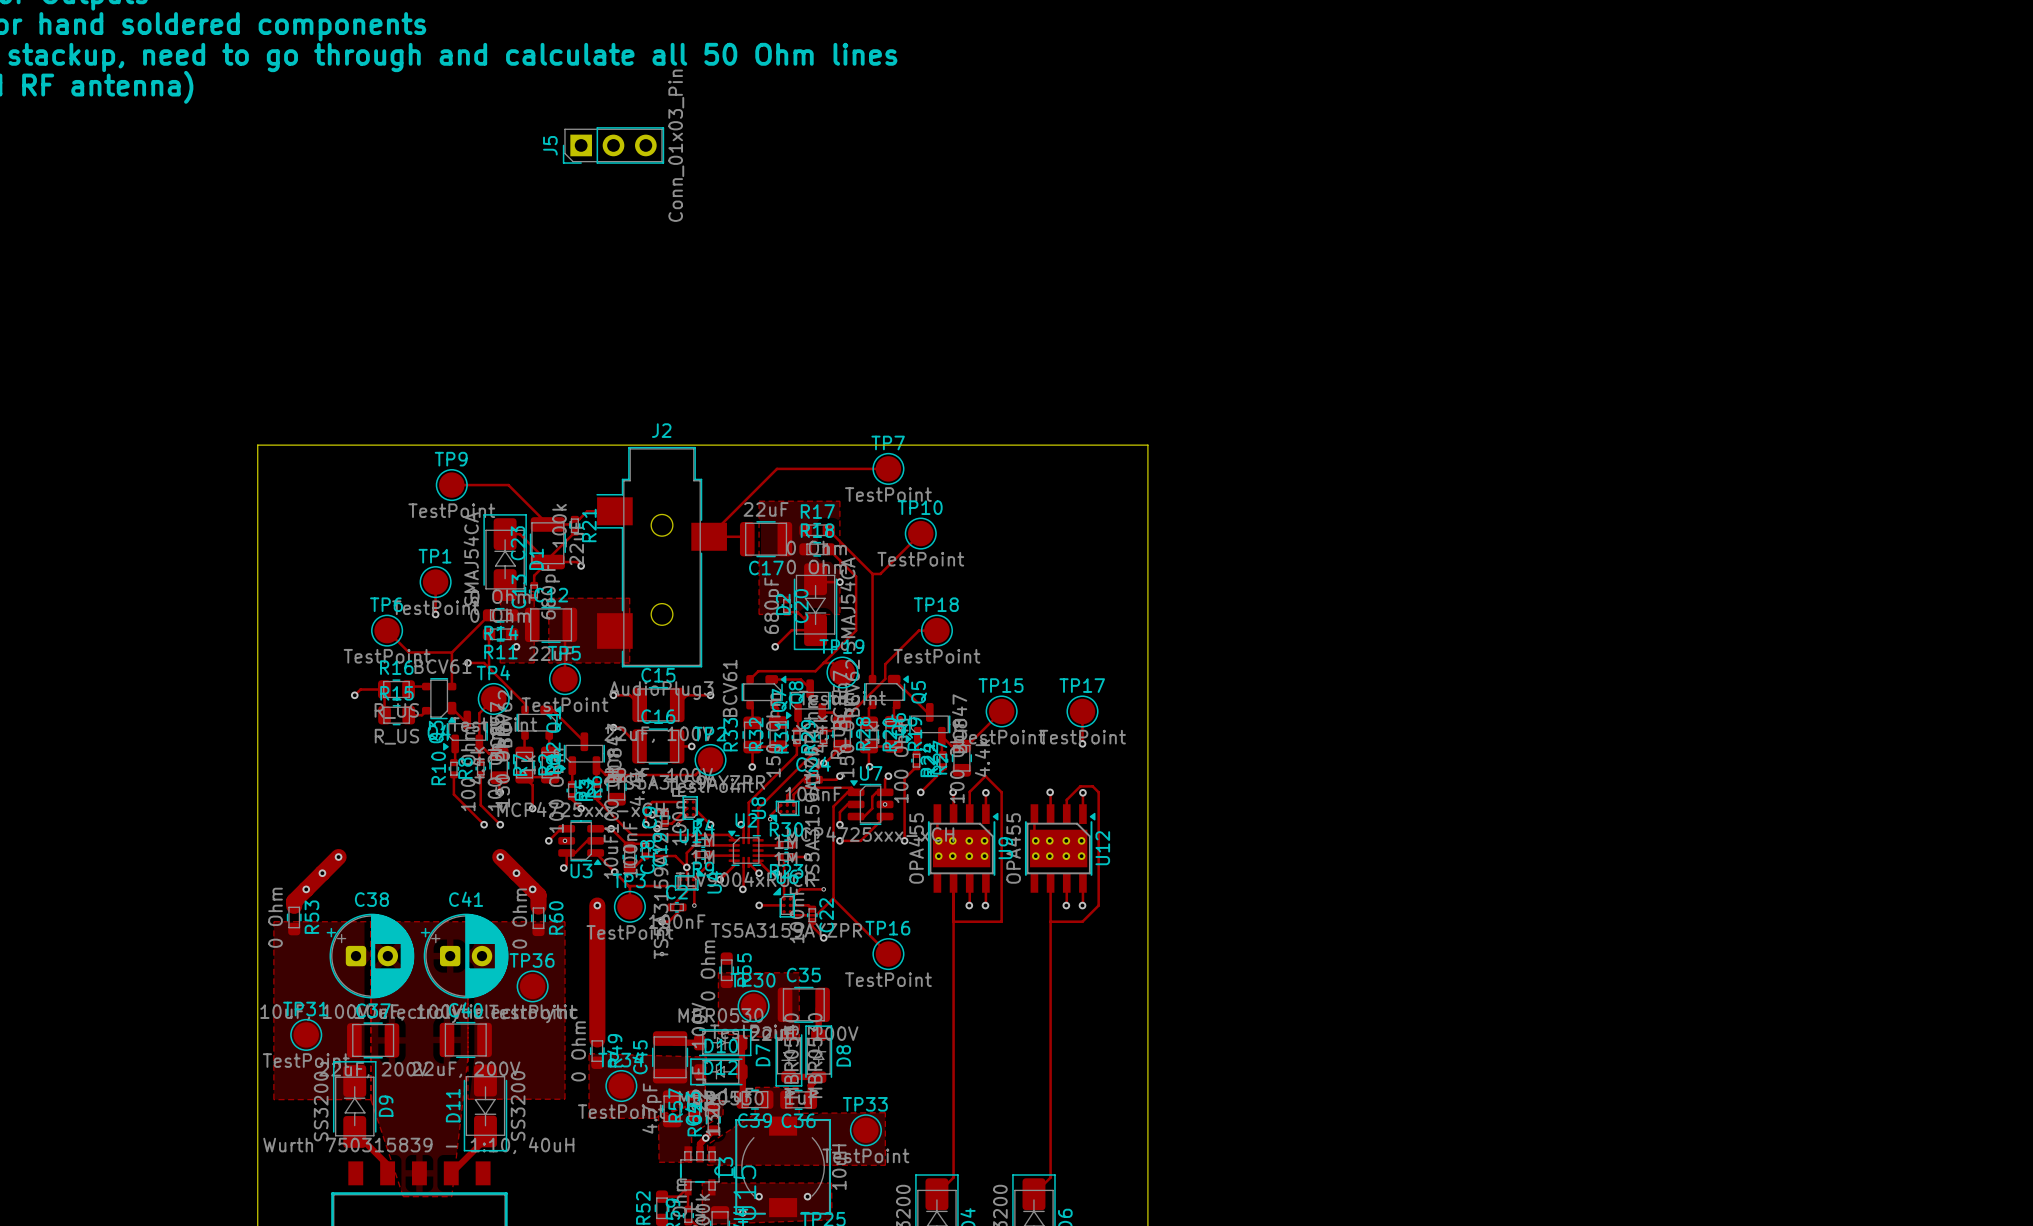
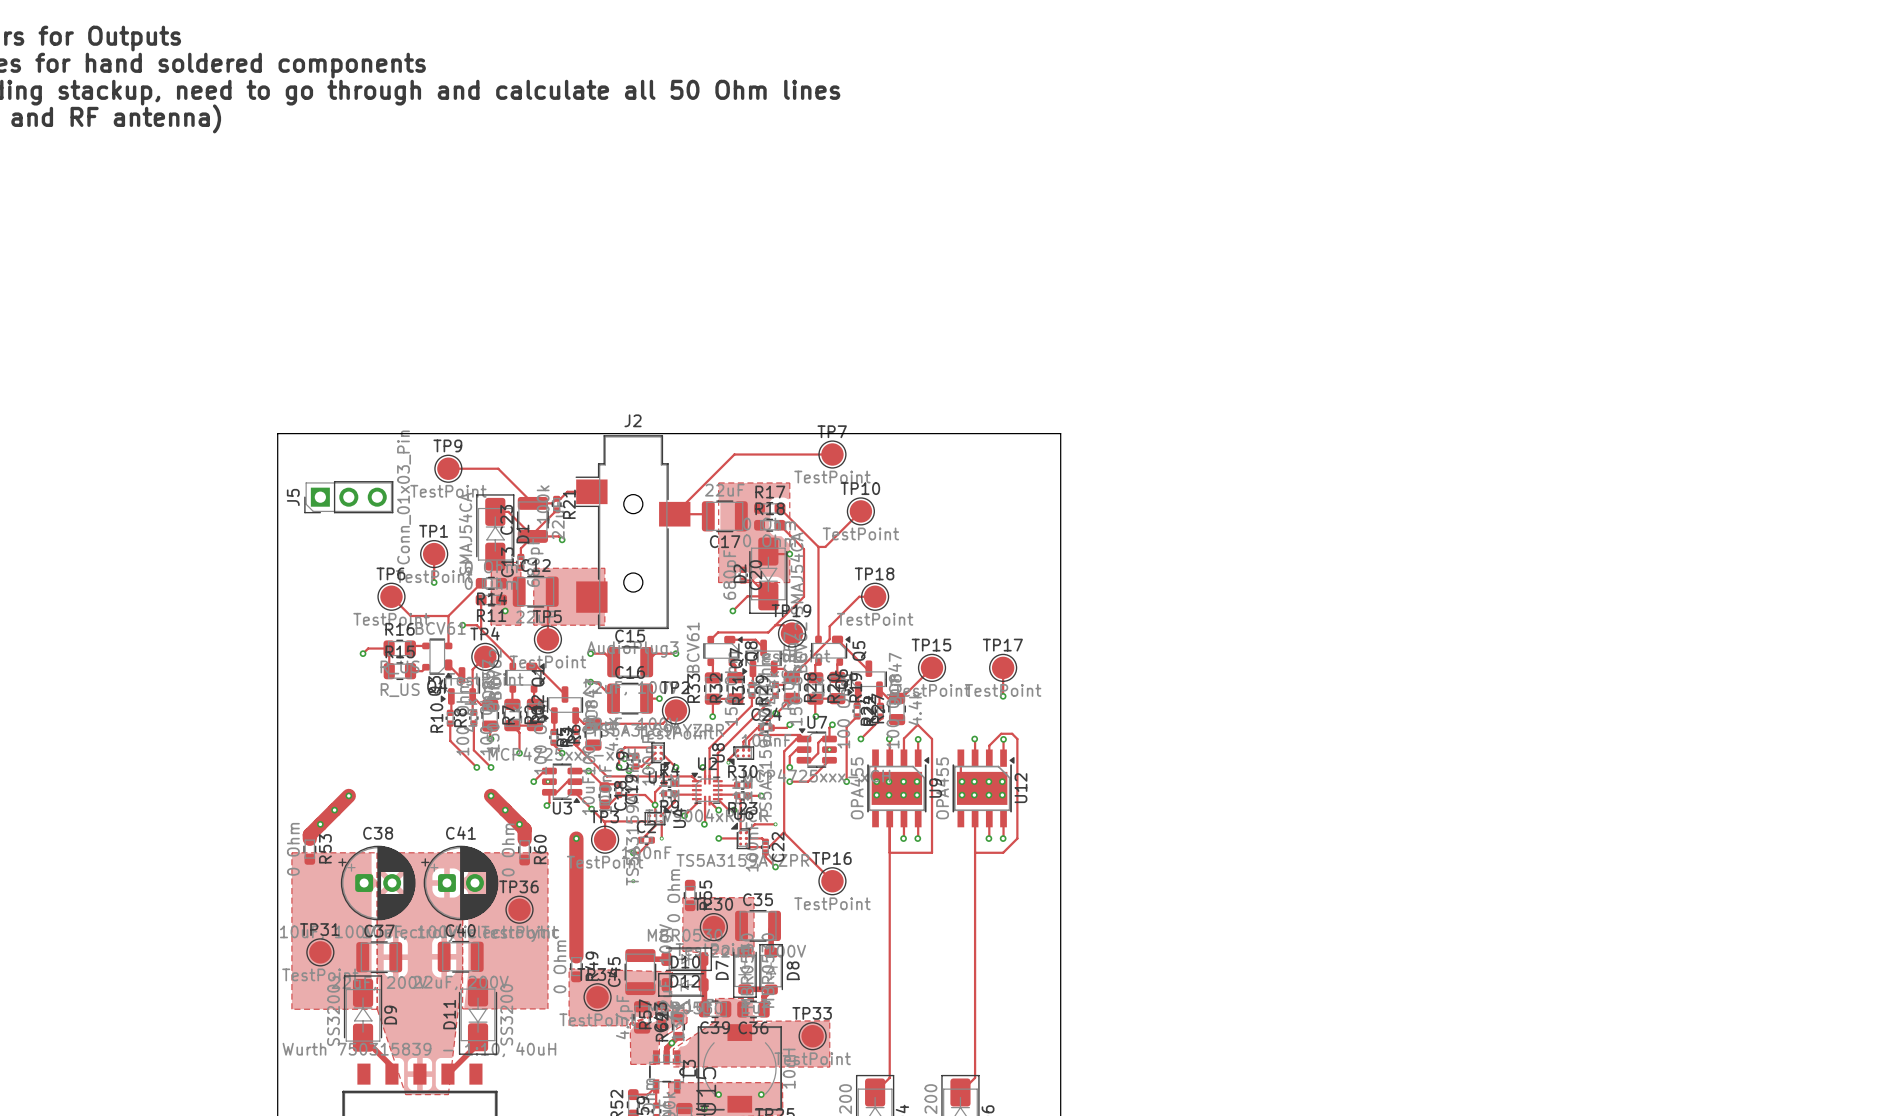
J5 position: (613, 145) -> (348, 497)

